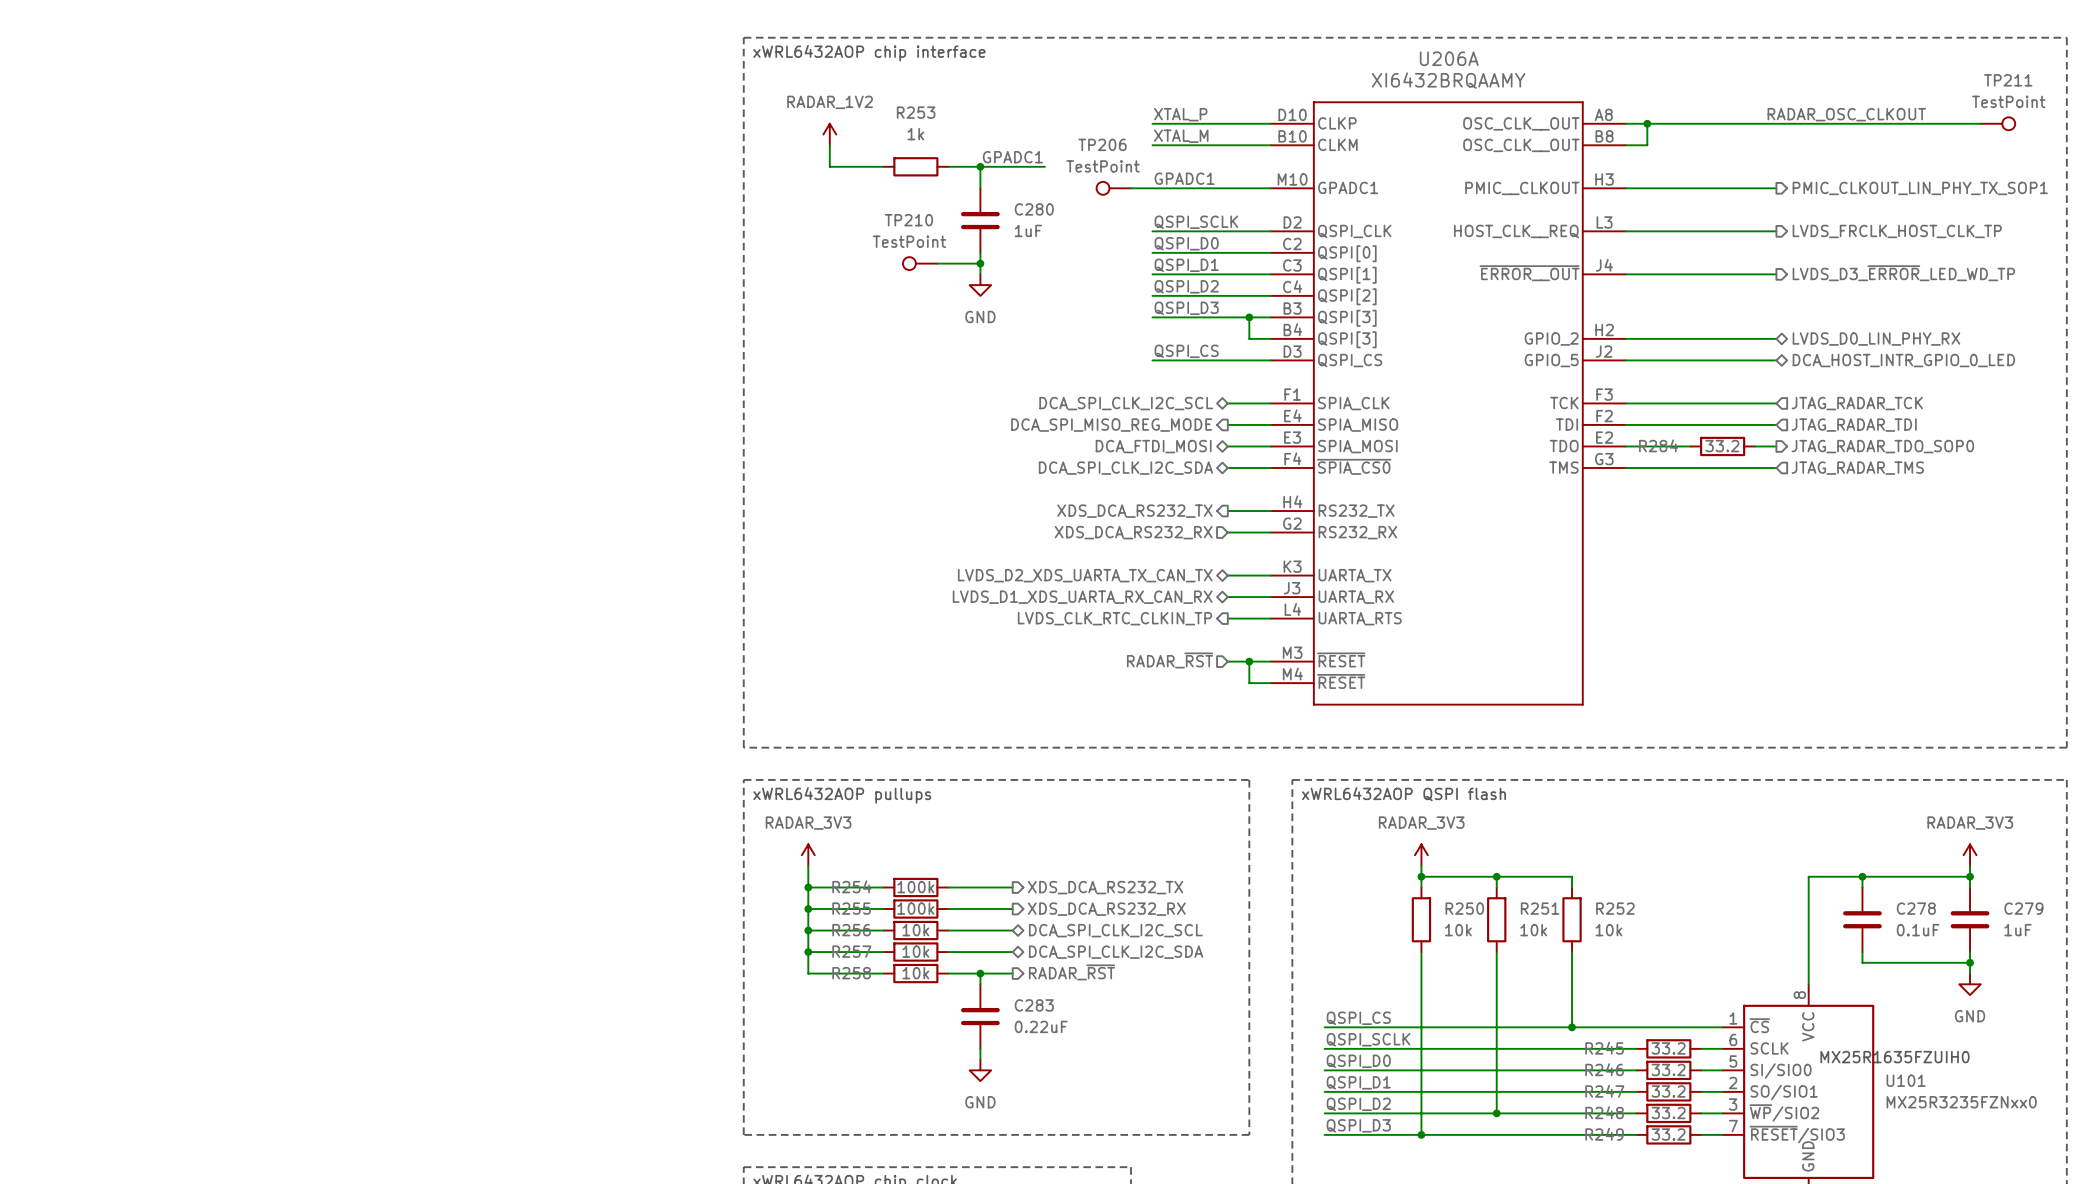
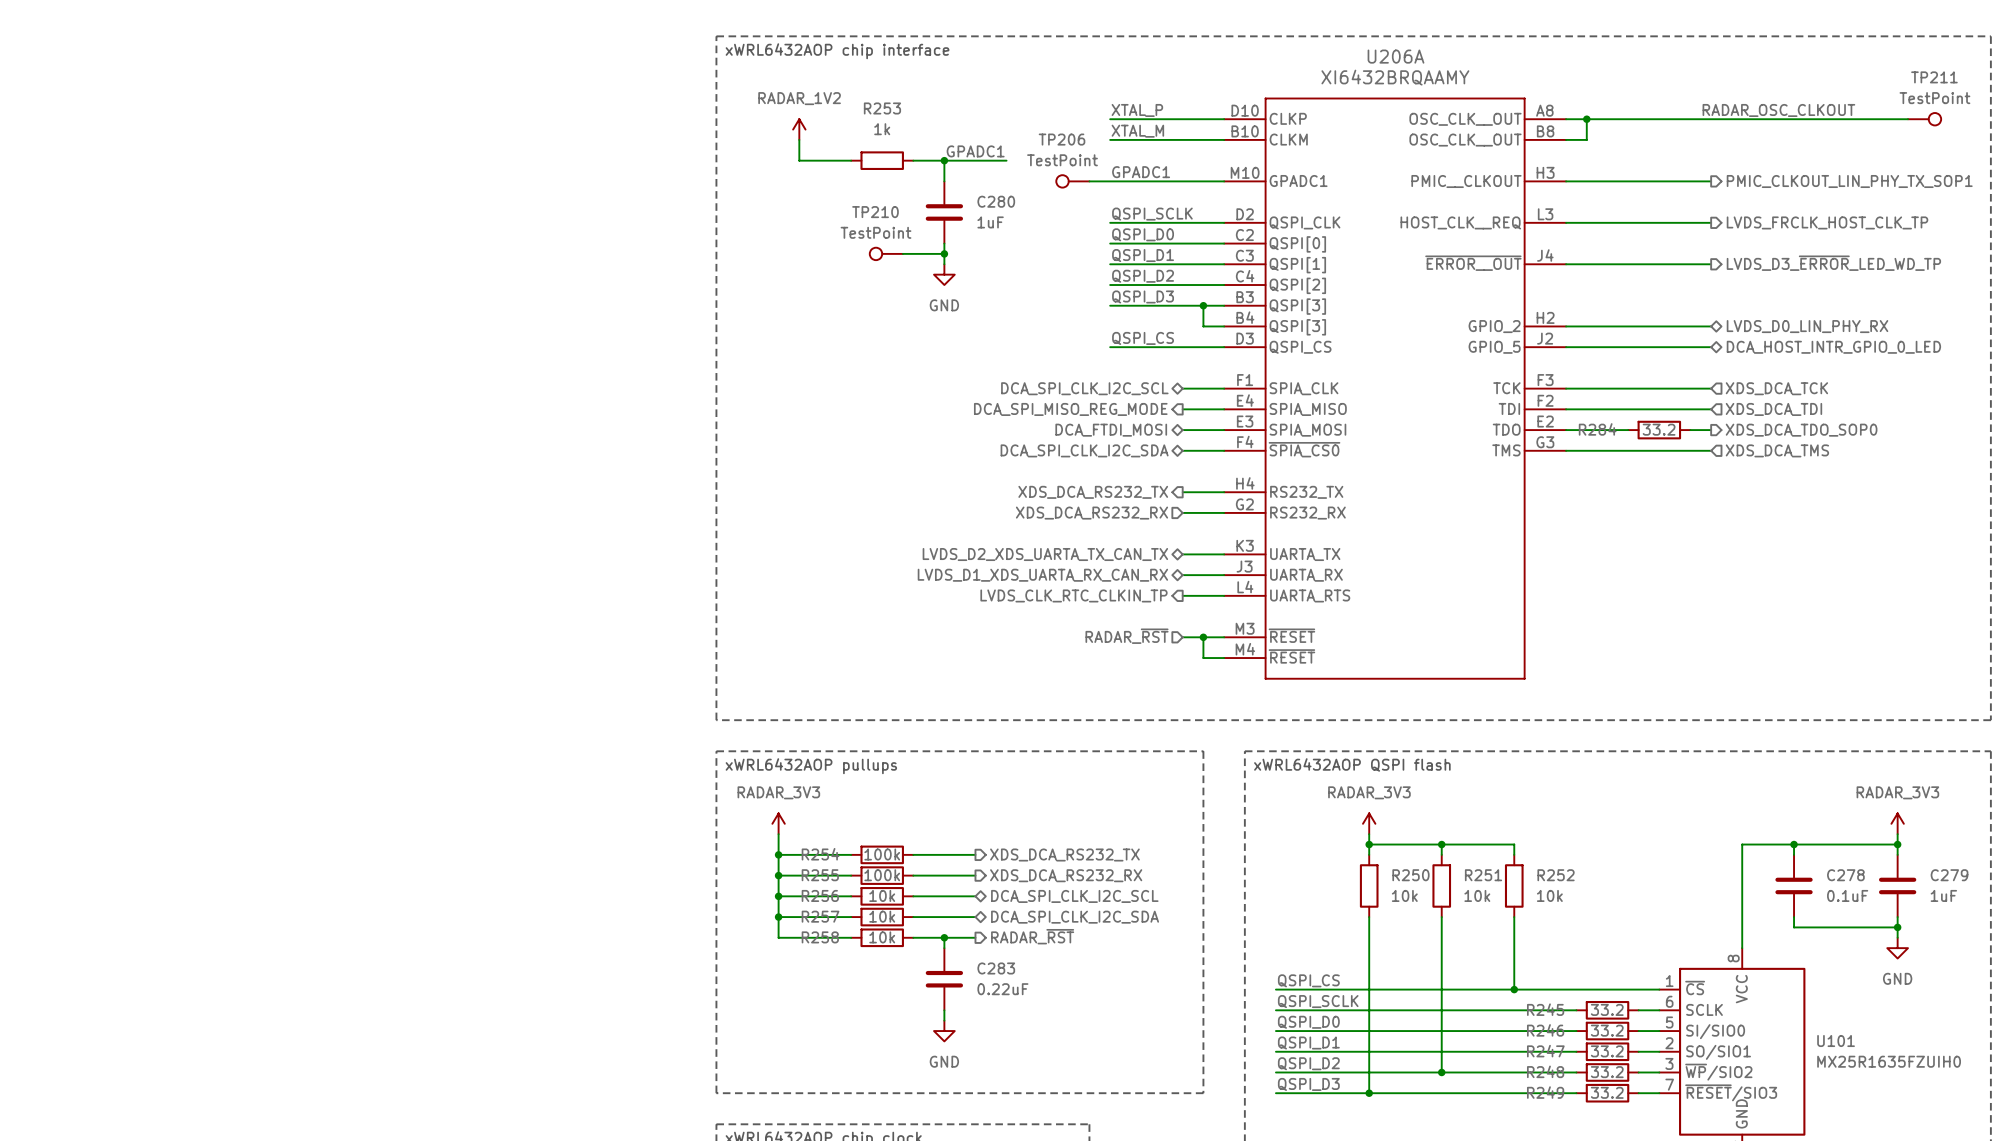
hierarchical label: JTAG_RADAR_TCK (1857, 403) -> XDS_DCA_TCK (1776, 388)
hierarchical label: JTAG_RADAR_TDI (1854, 425) -> XDS_DCA_TDI (1773, 409)
hierarchical label: JTAG_RADAR_TDO_SOP0 (1882, 446) -> XDS_DCA_TDO_SOP0 (1801, 430)
hierarchical label: JTAG_RADAR_TMS (1857, 468) -> XDS_DCA_TMS (1777, 450)
text: MX25R1635FZUIH0 (1894, 1057) -> none
U101 value: MX25R3235FZNxx0 (1961, 1102) -> MX25R1635FZUIH0 (1889, 1061)

